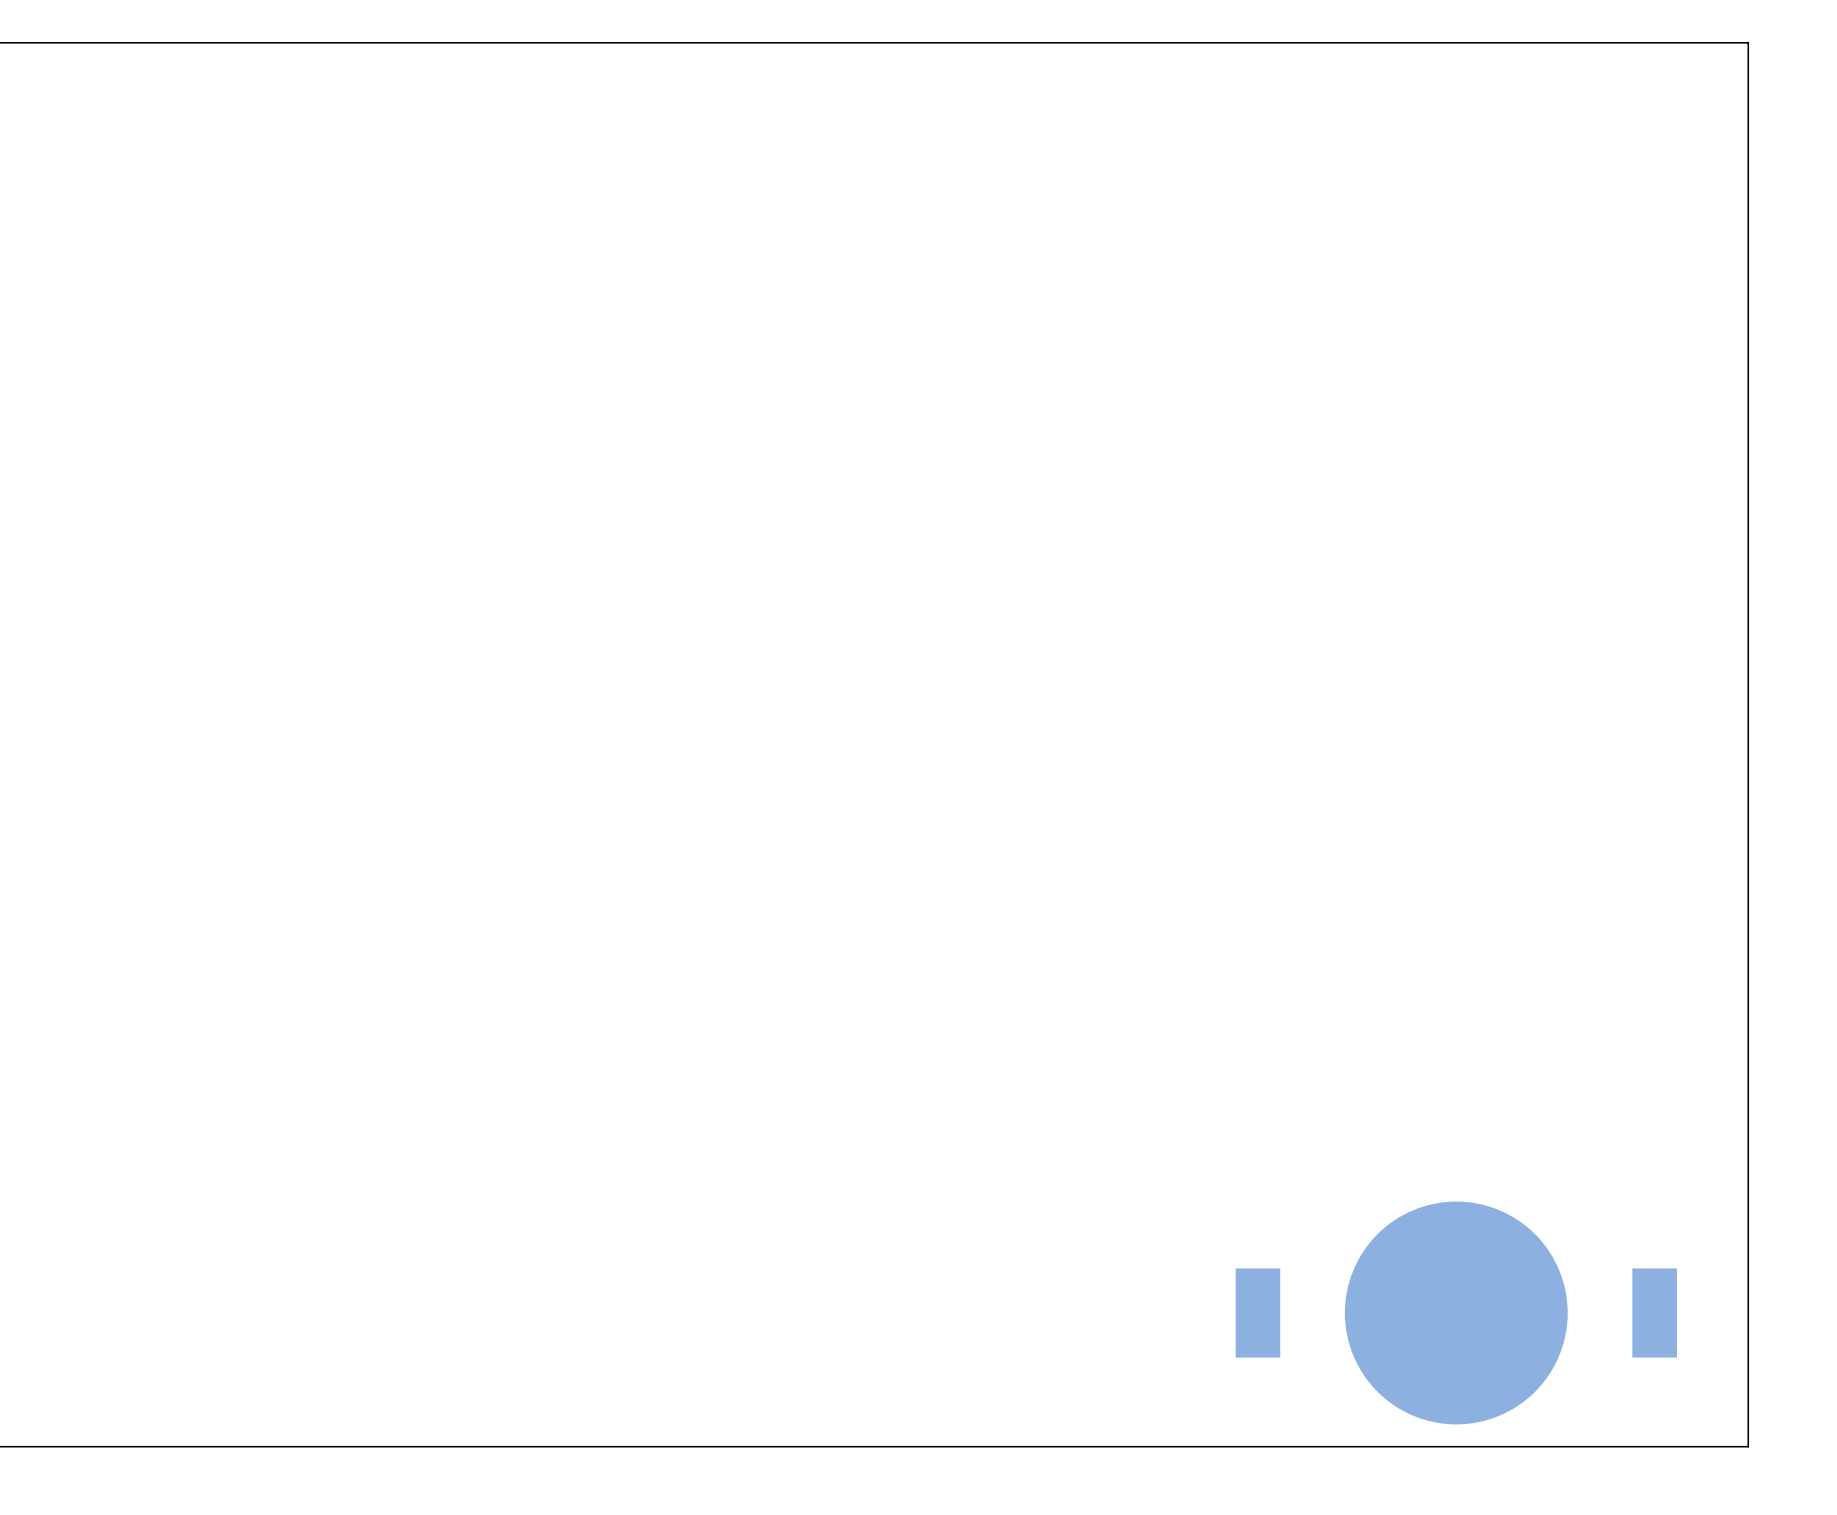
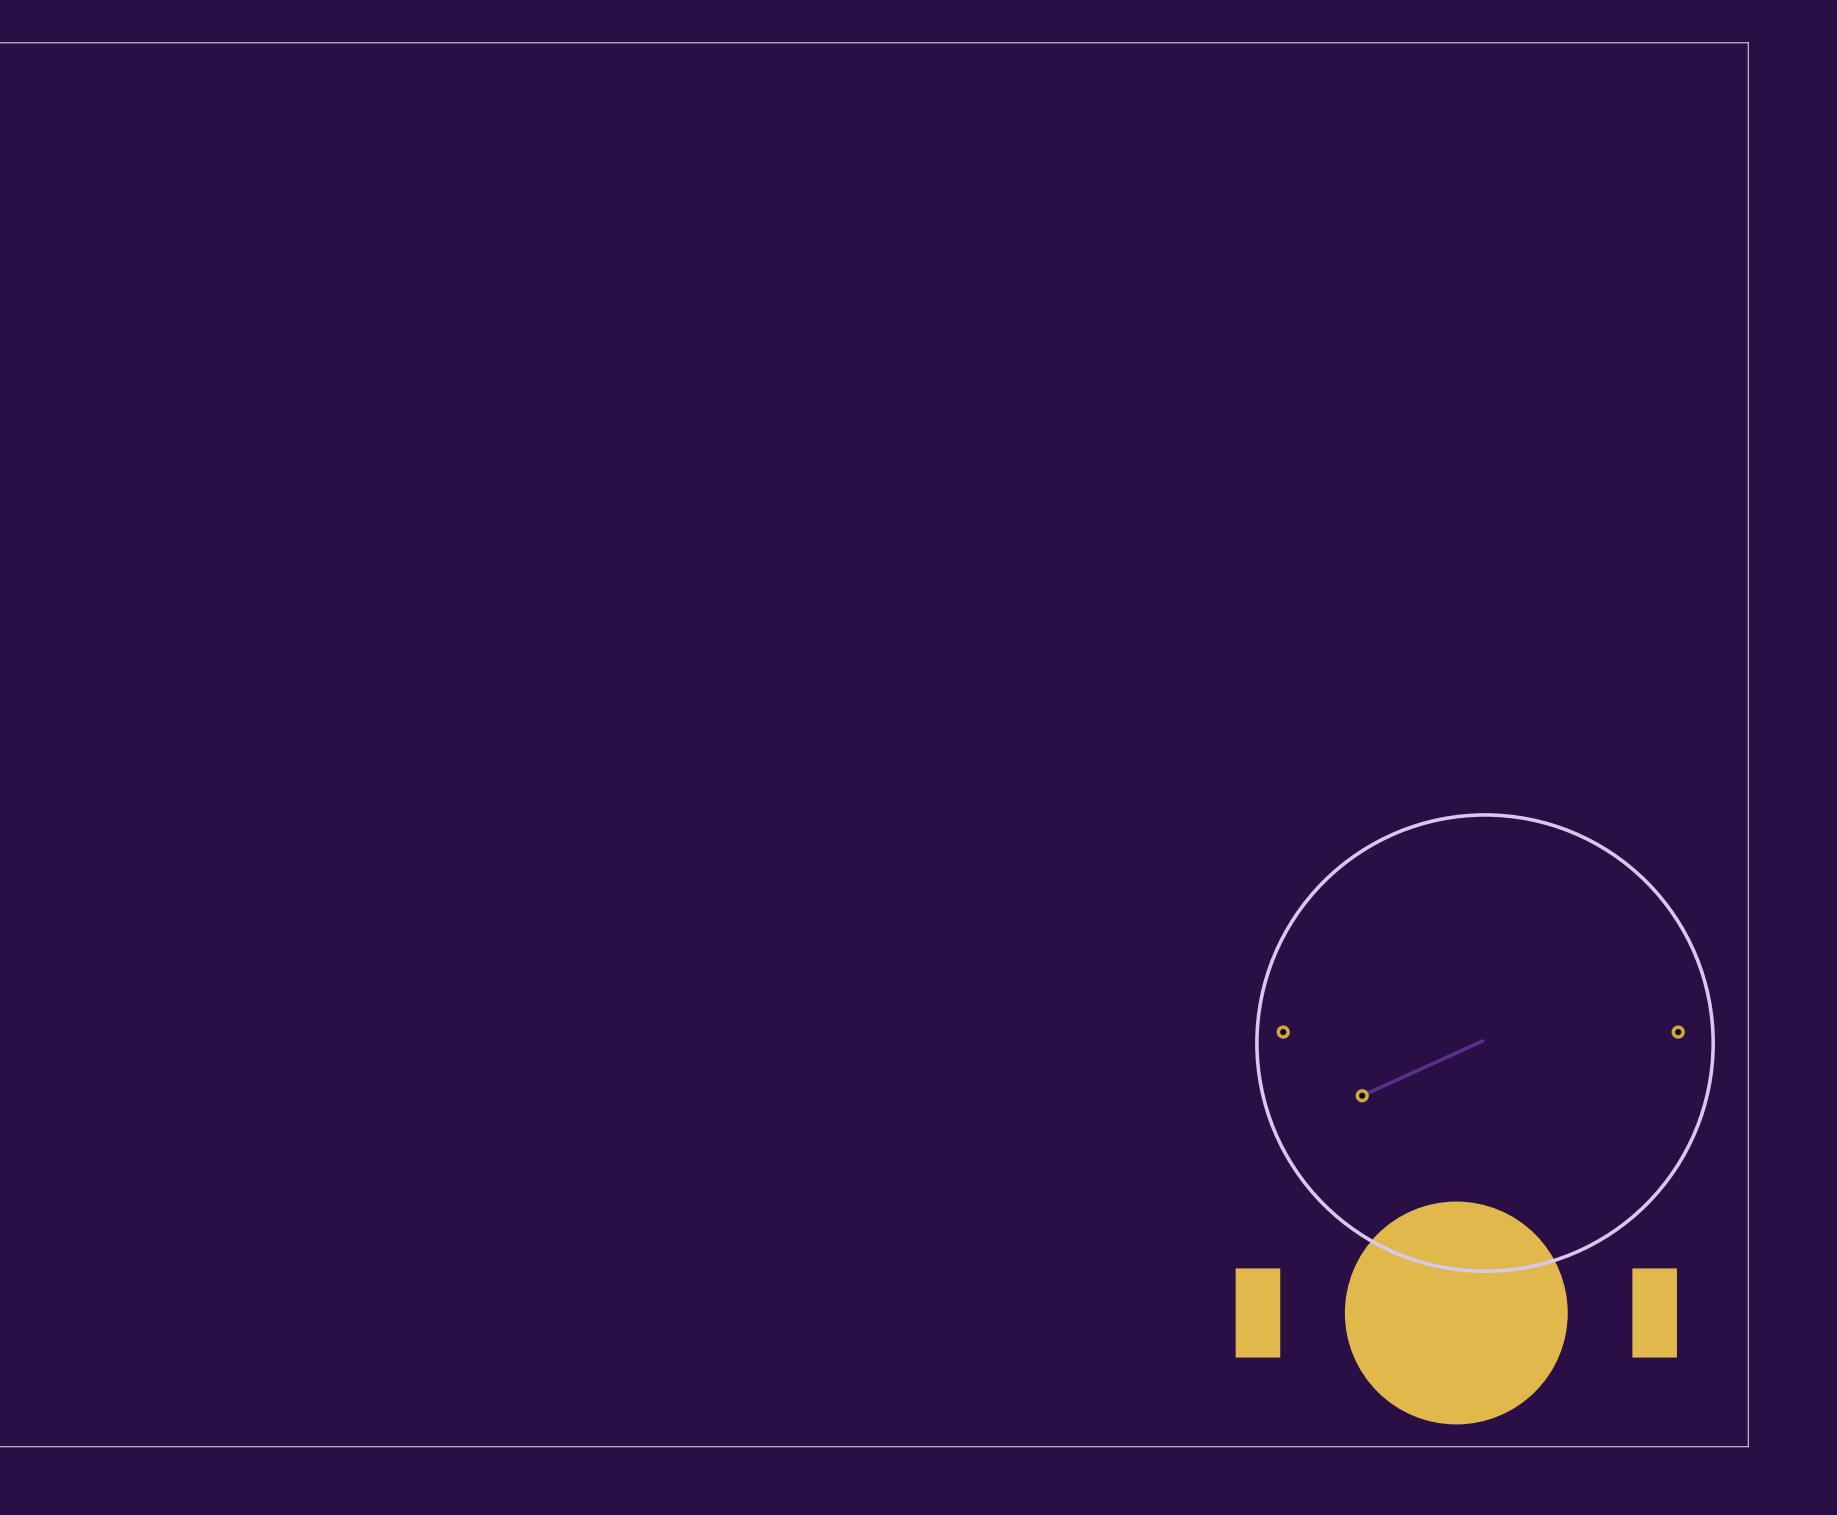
round board edge: none -> [1255, 813, 1715, 1274]
via: none -> (1283, 1032)
via: none -> (1678, 1032)
track: none -> (1482, 1040) (1362, 1095)
via: none -> (1362, 1095)

